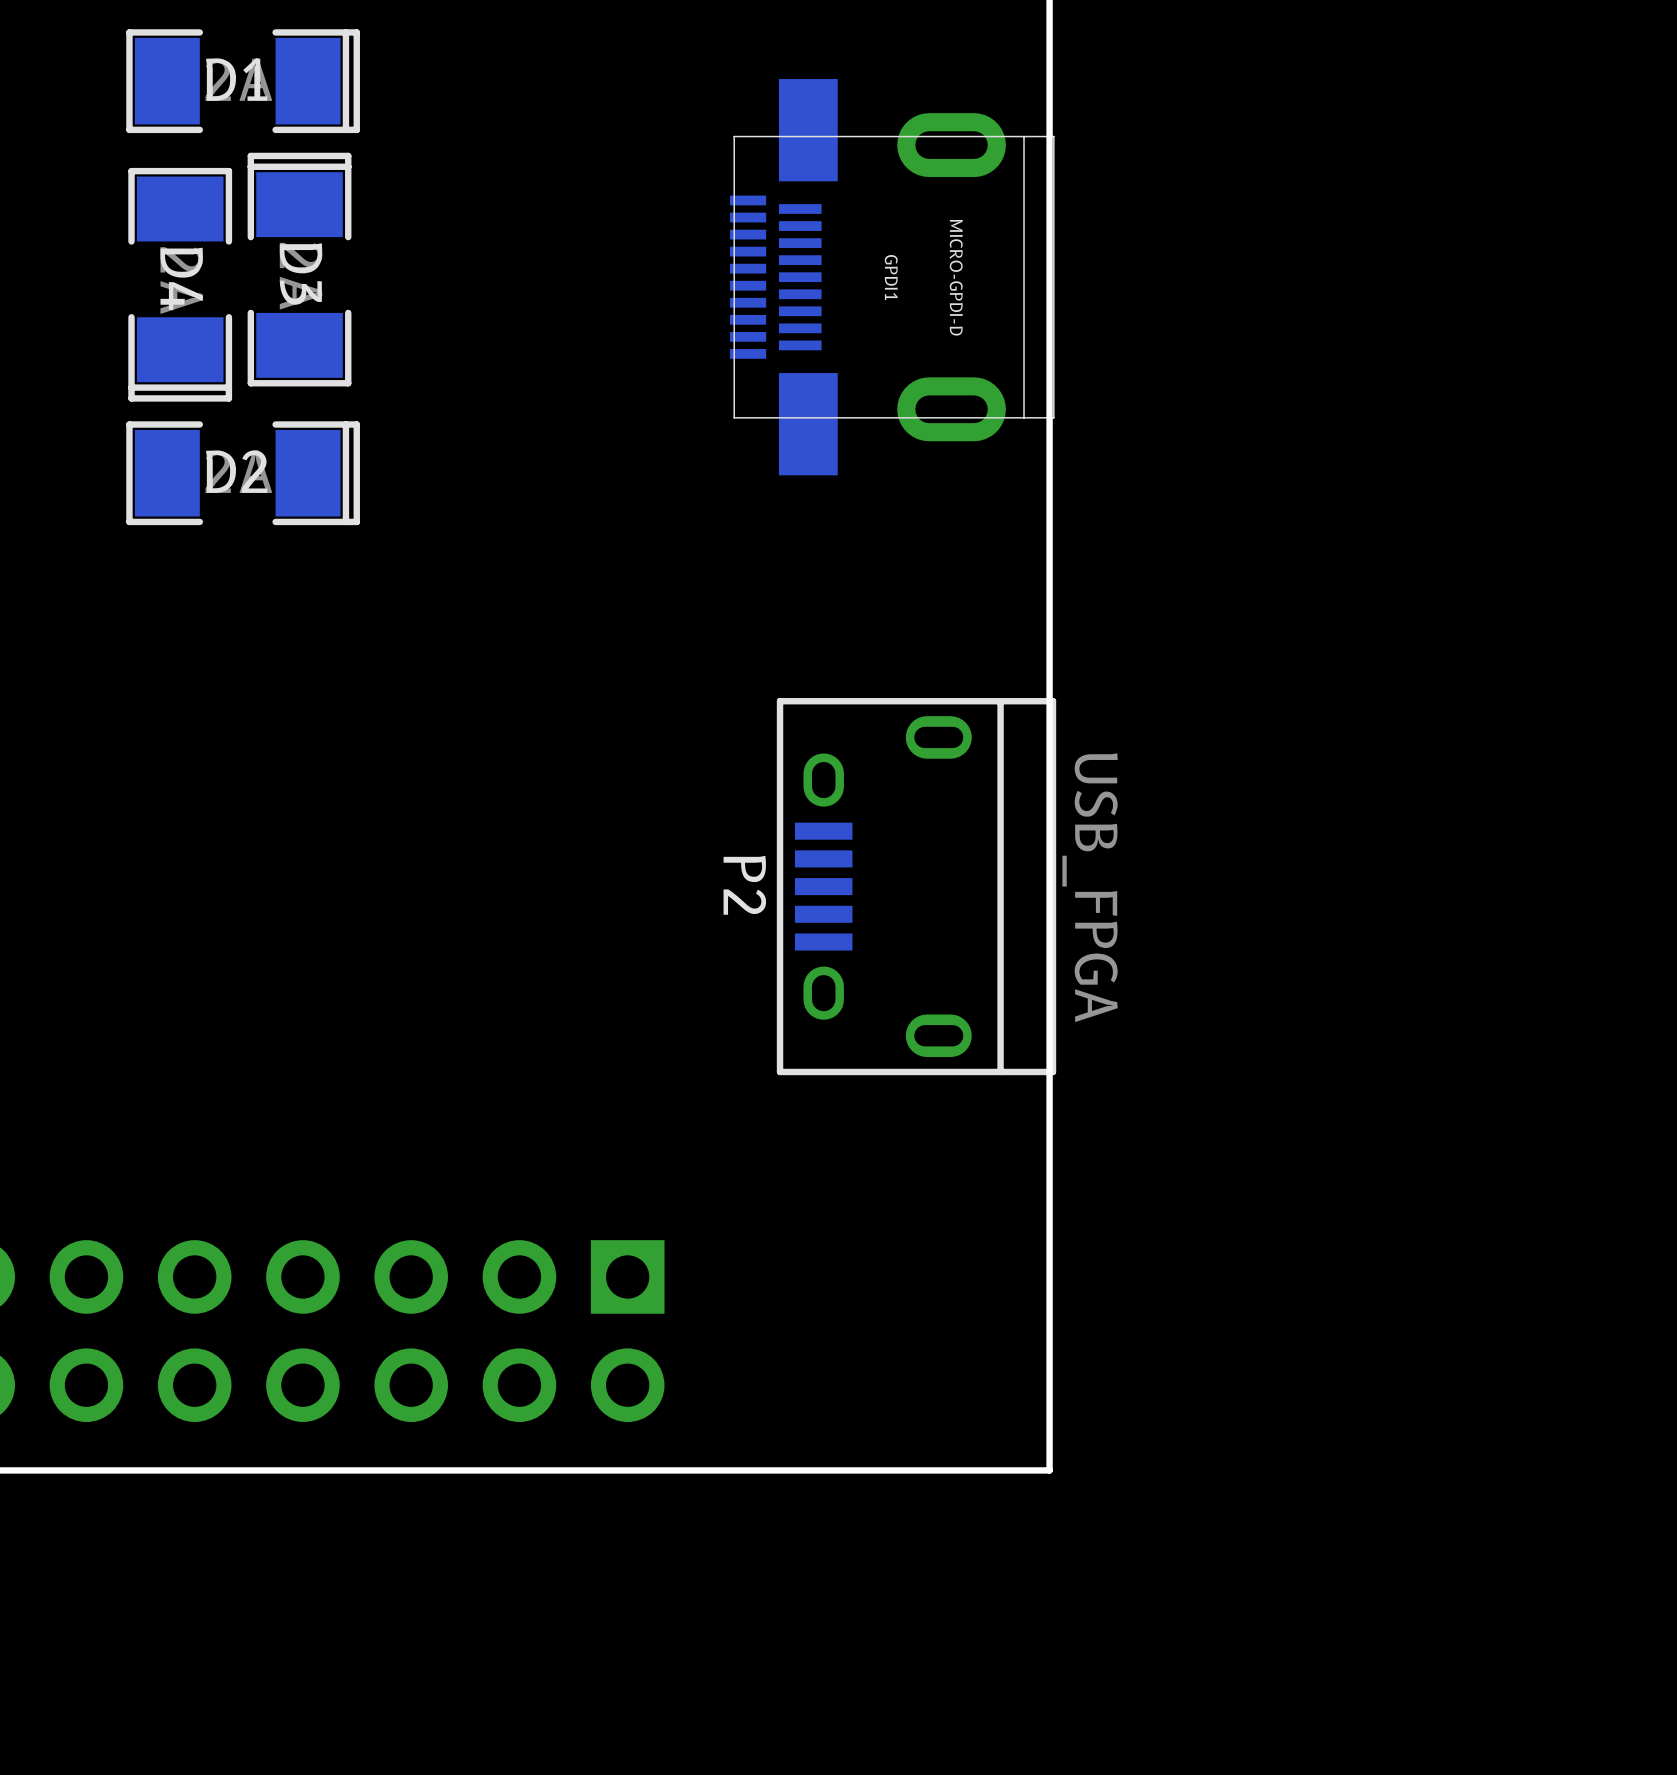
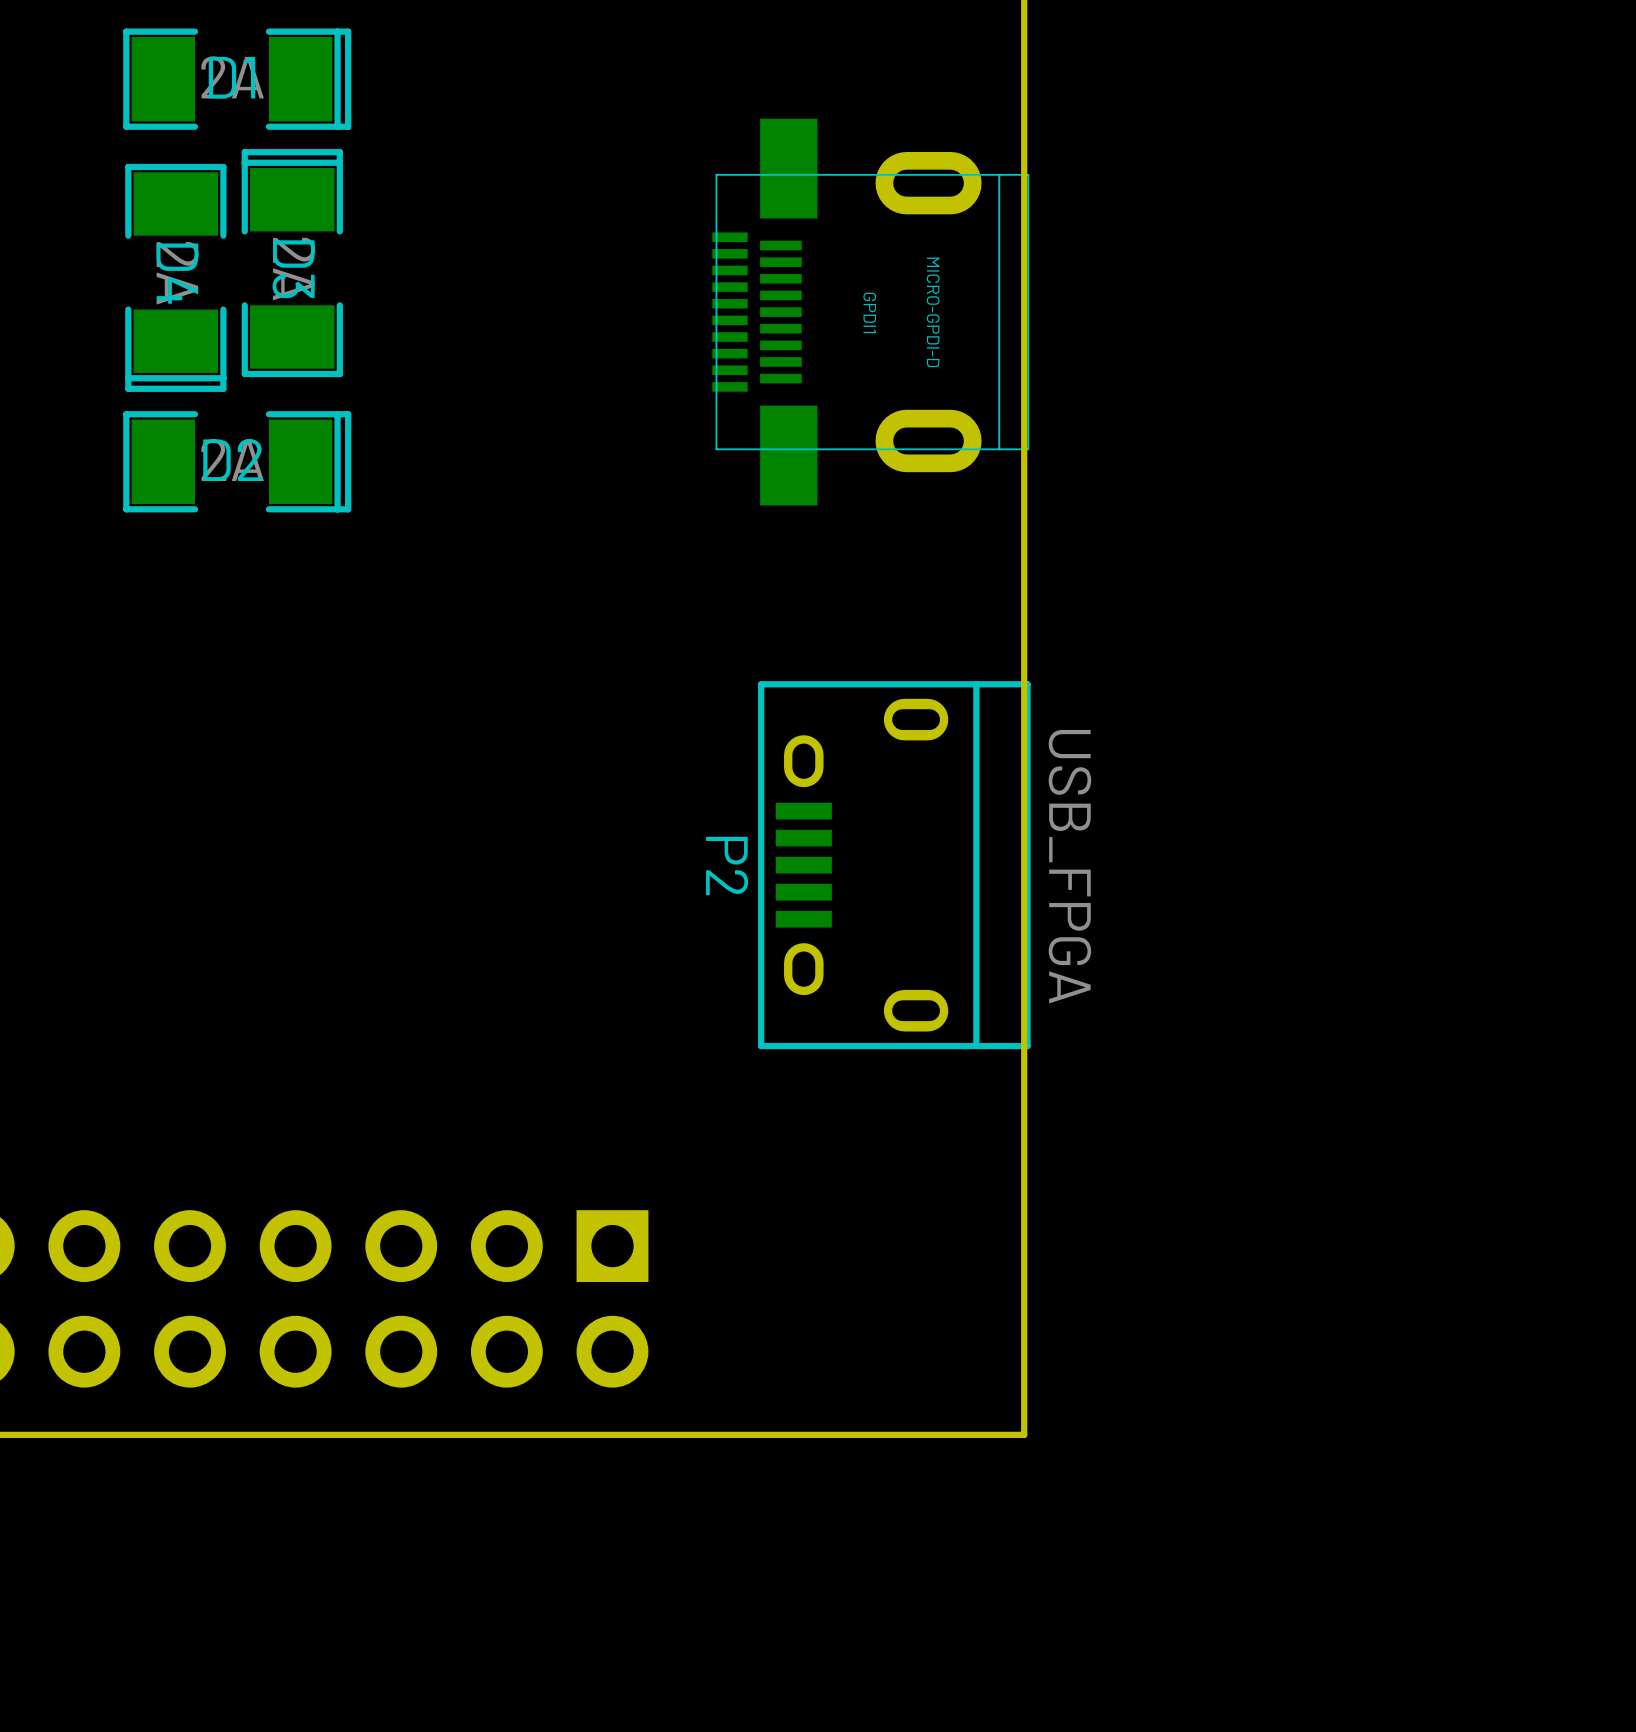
GPDI1 position: (891, 277) -> (870, 312)

